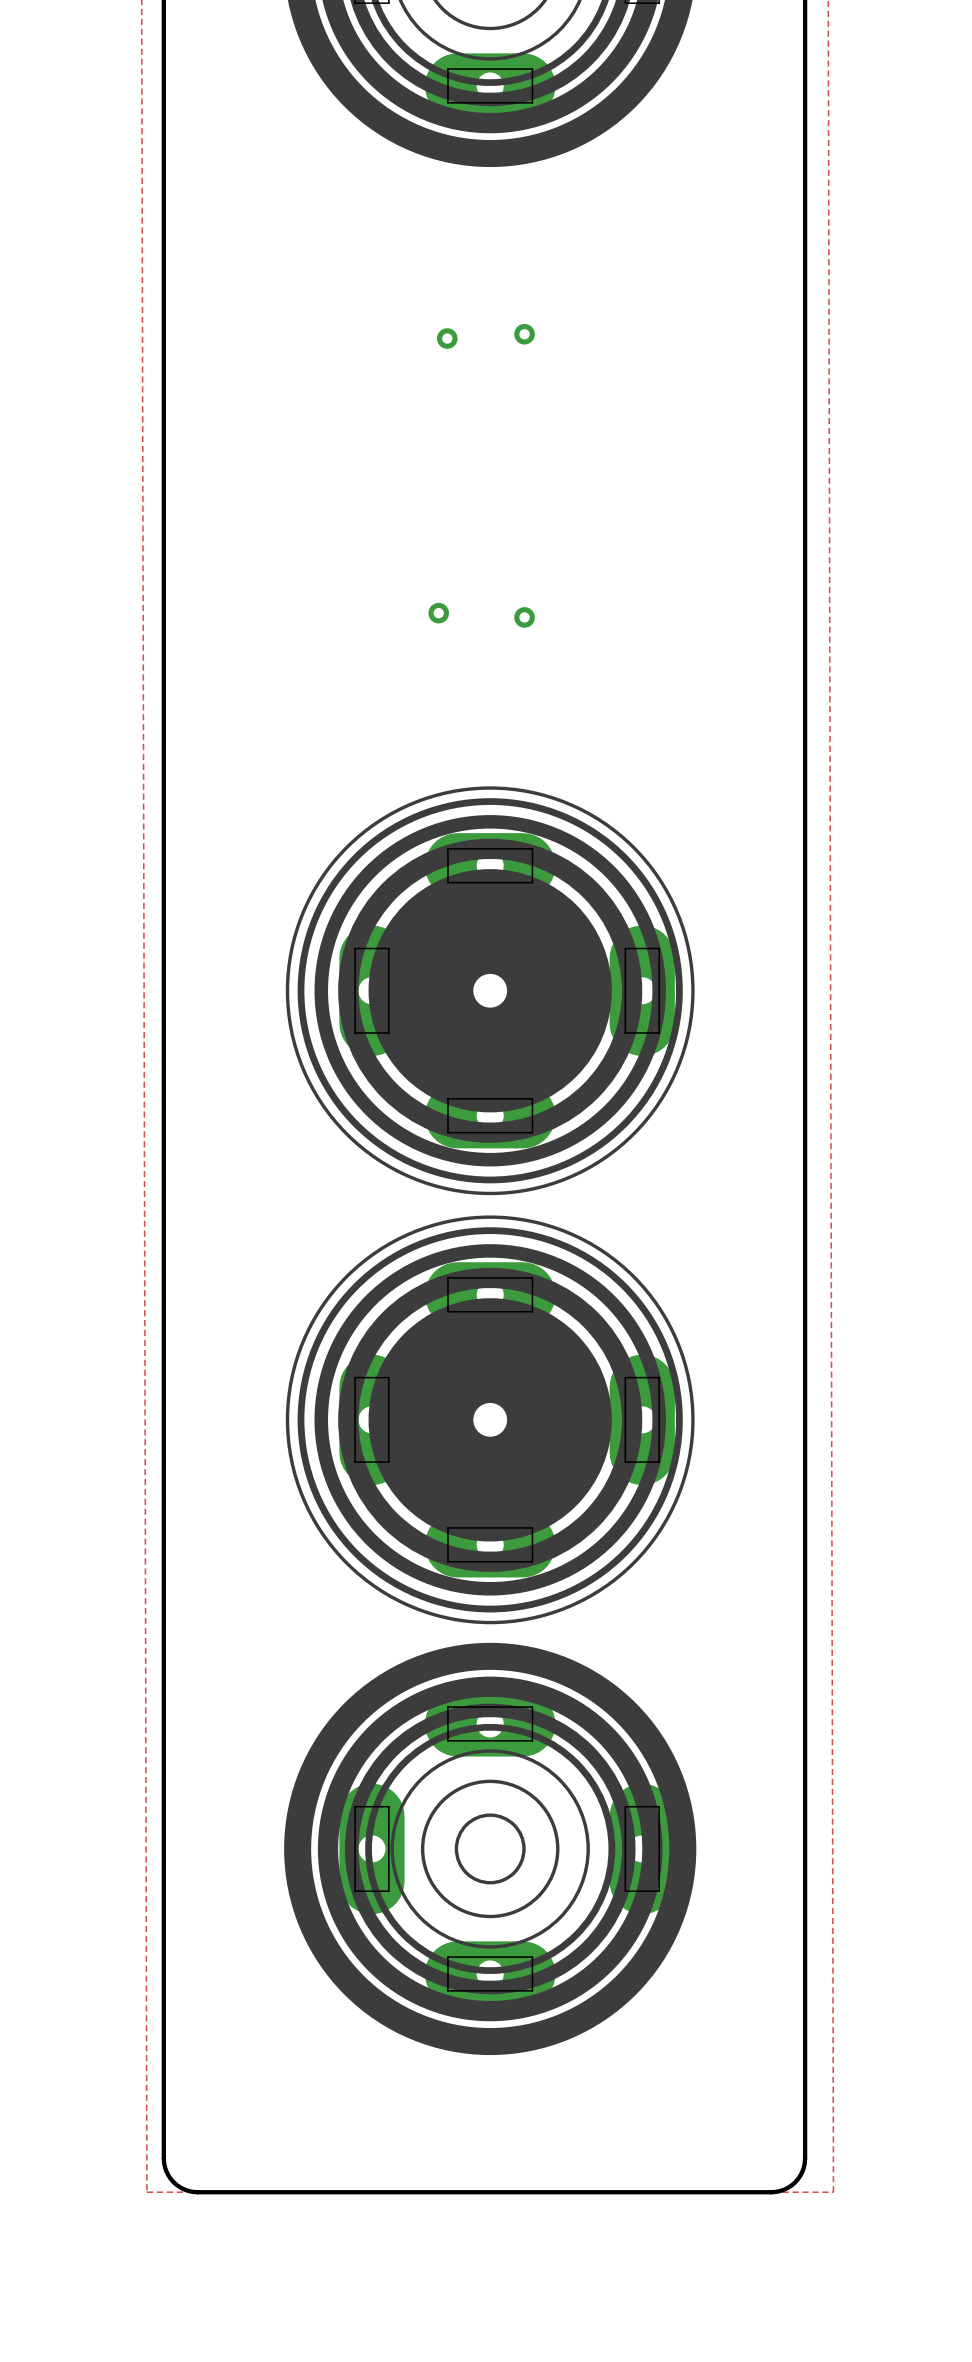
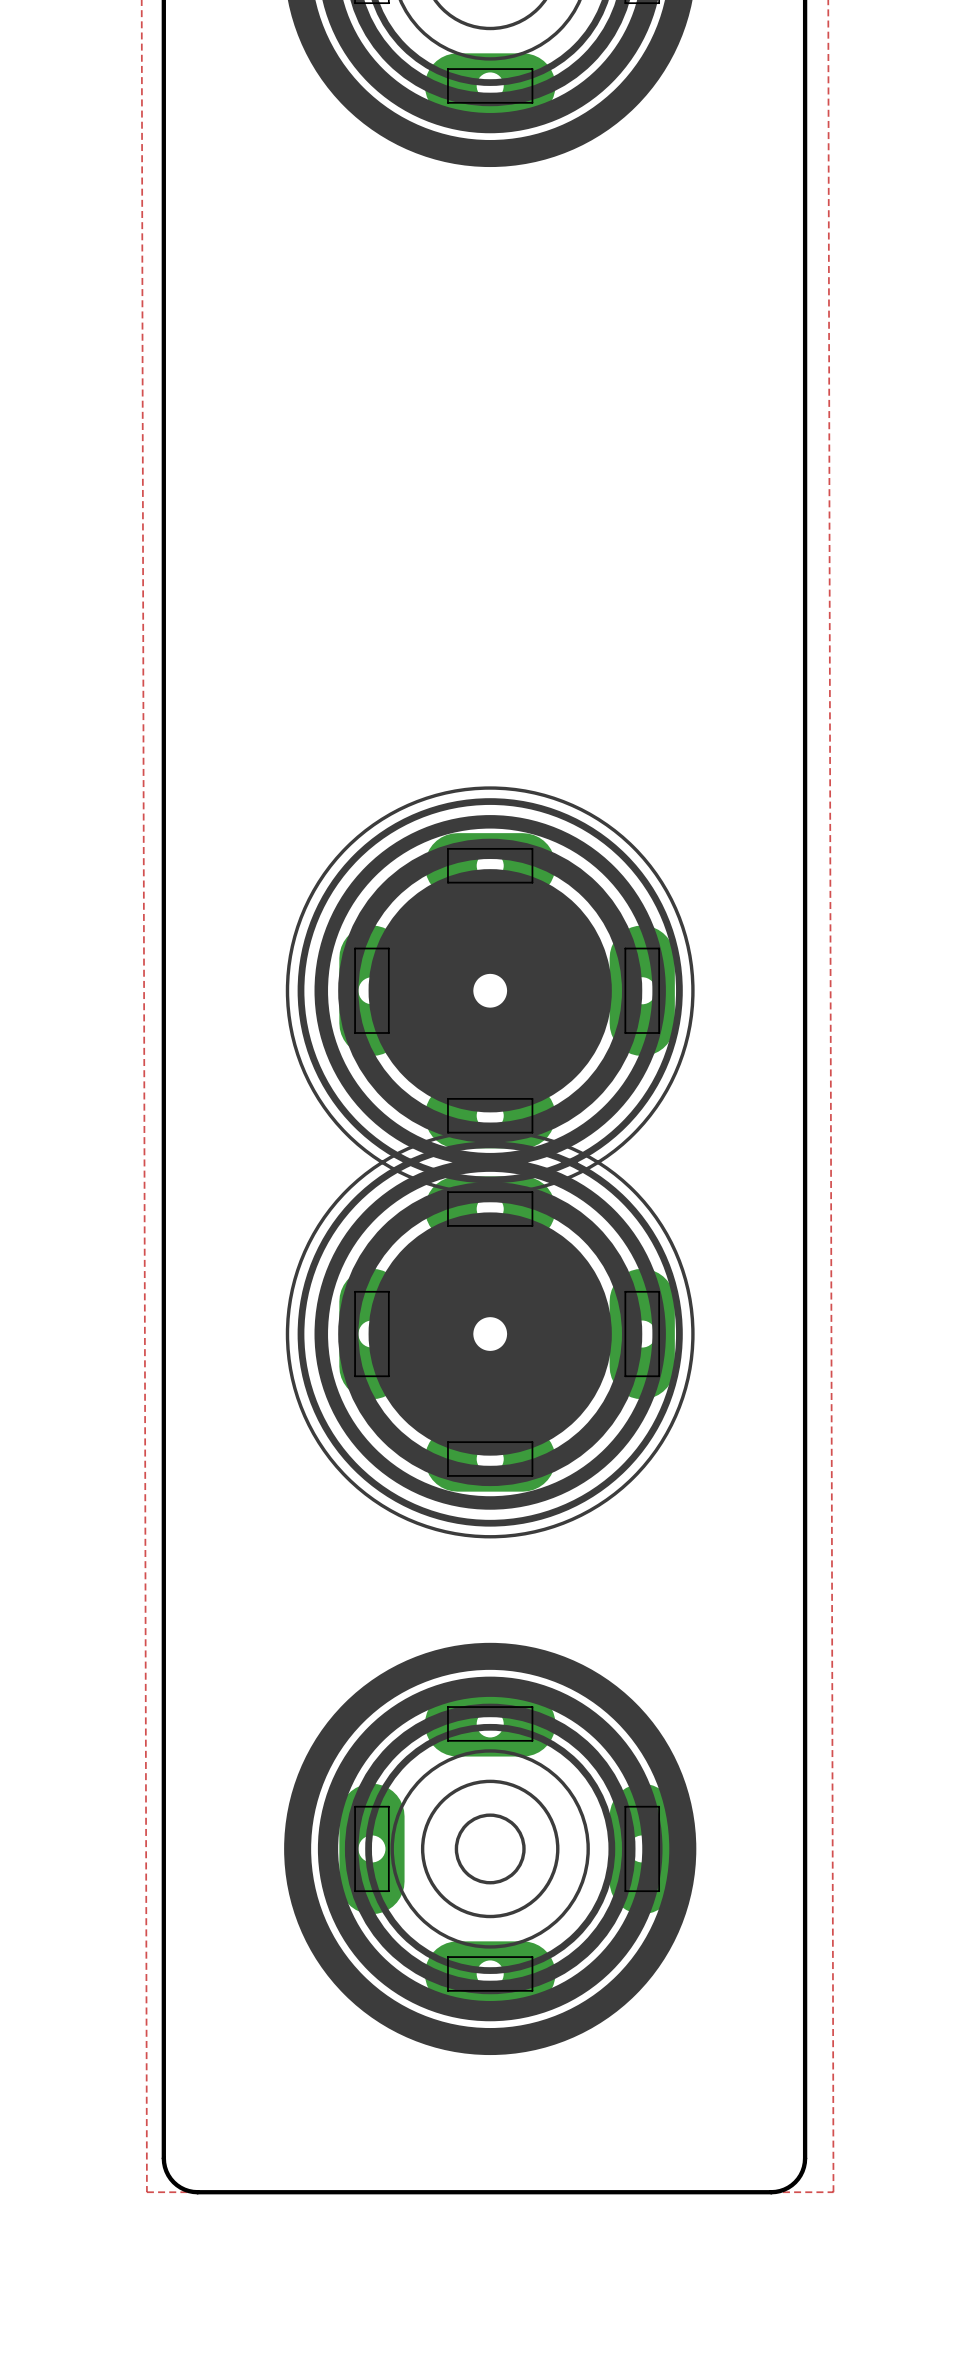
via: (524, 334) -> none
via: (447, 338) -> none
via: (438, 613) -> none
via: (524, 617) -> none
part position: (490, 1419) -> (490, 1334)

